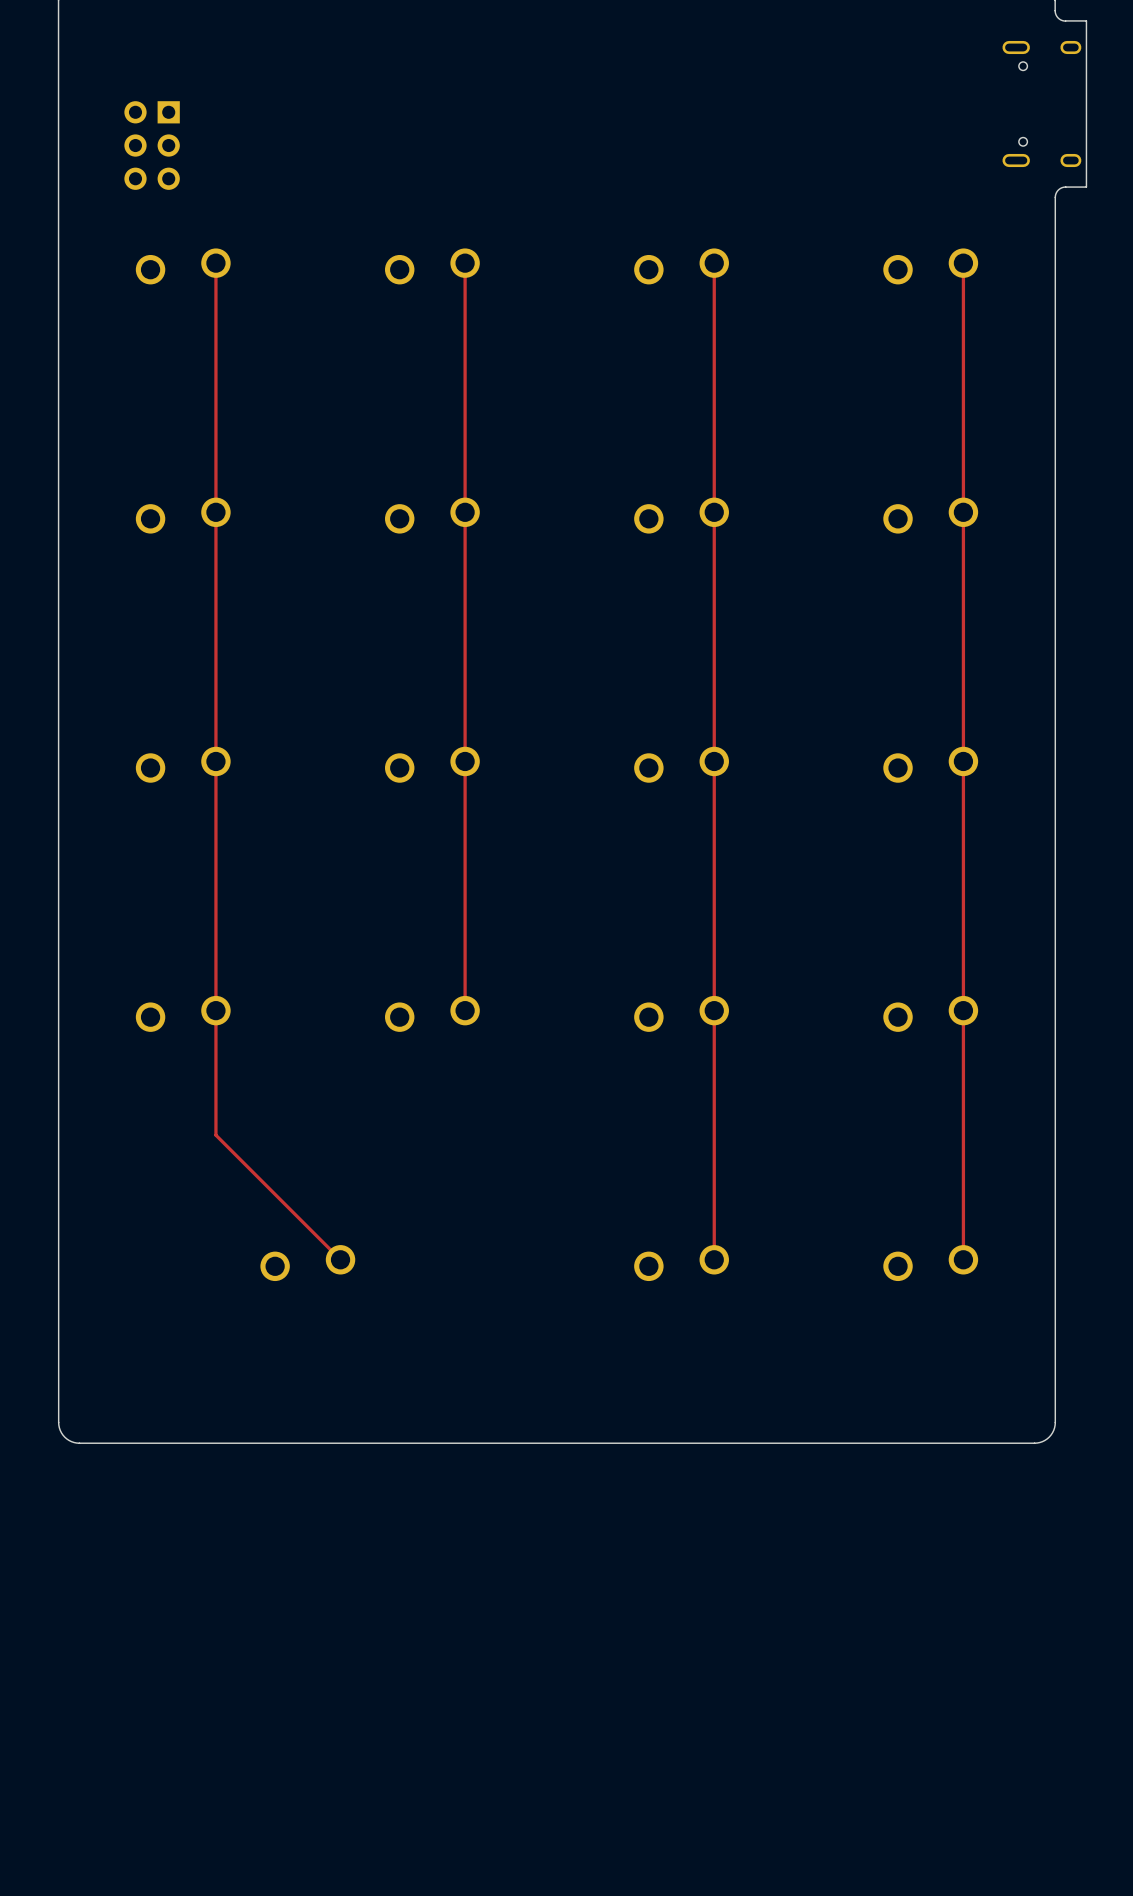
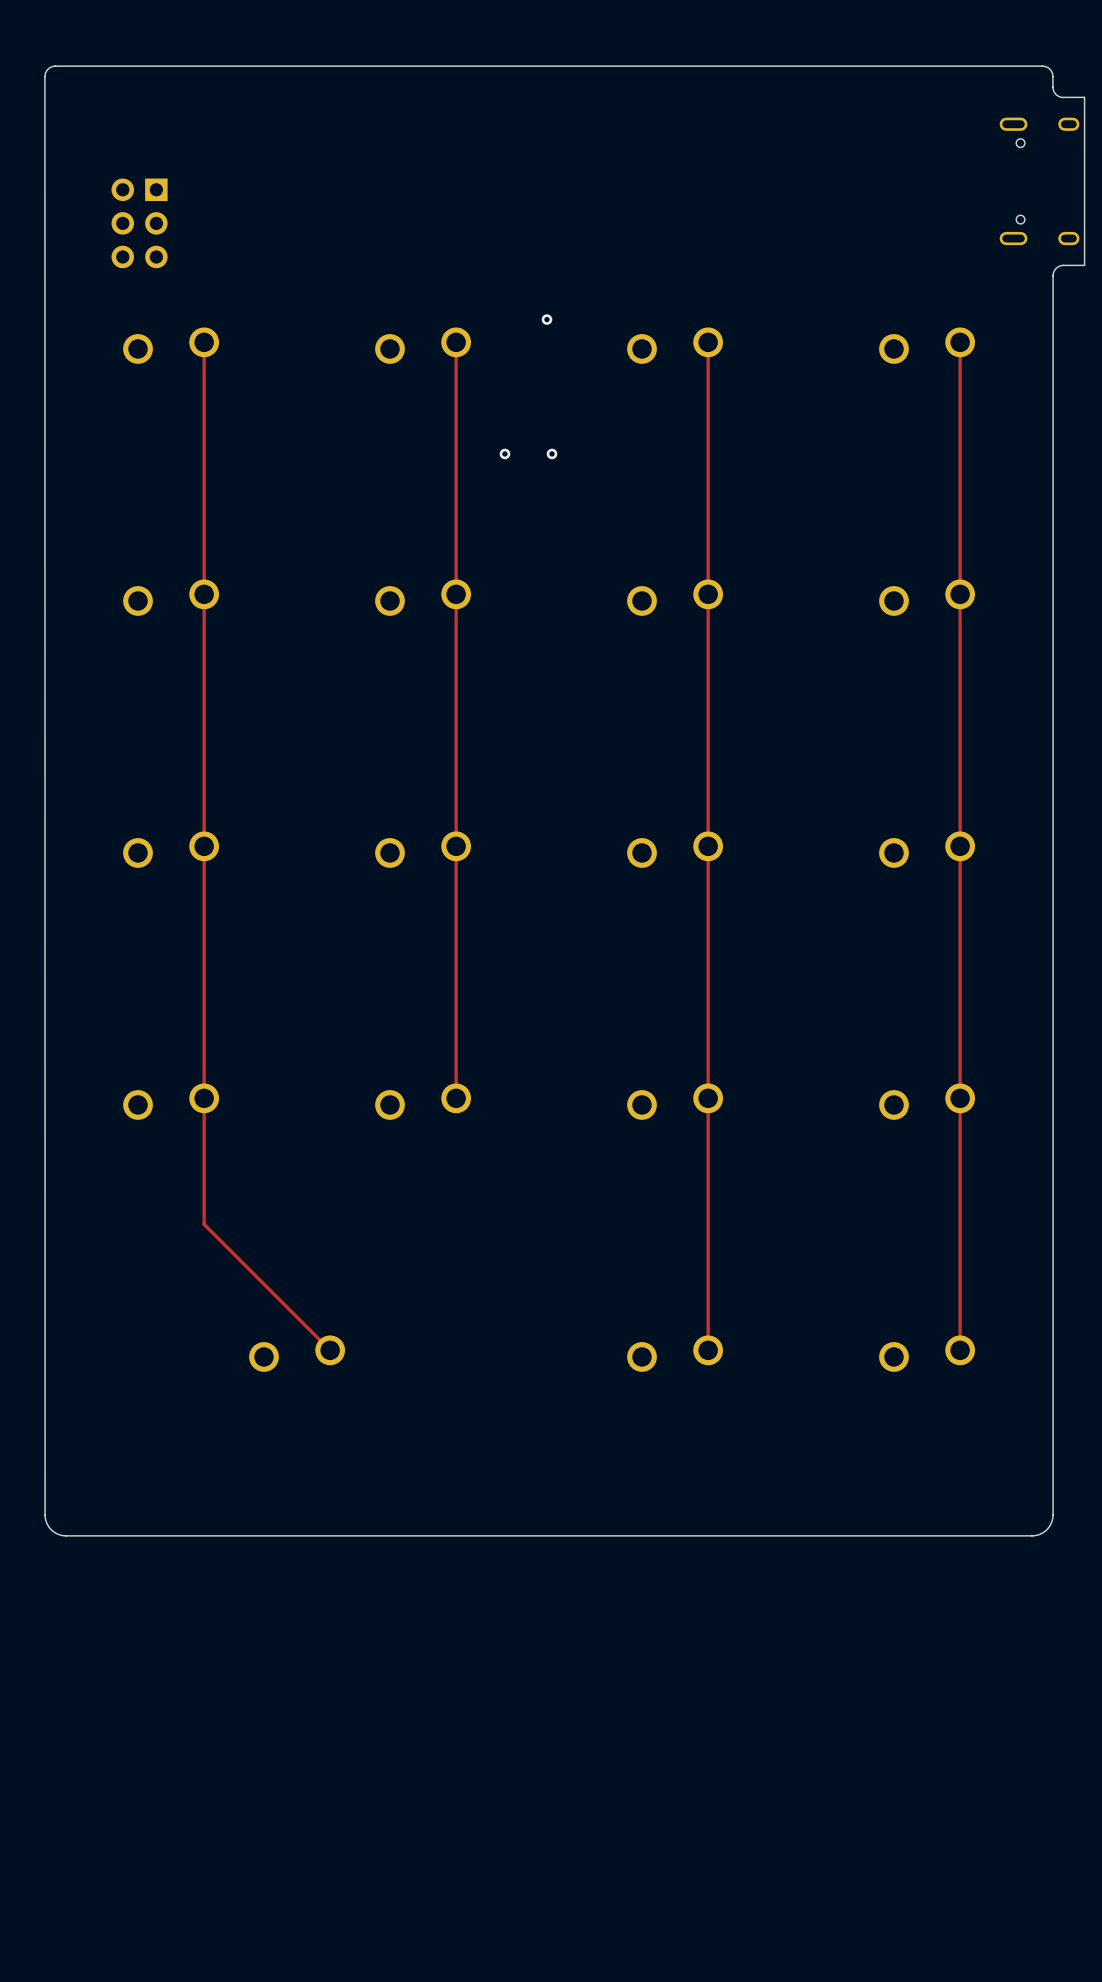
via: none -> (546, 319)
via: none -> (504, 453)
via: none -> (552, 453)

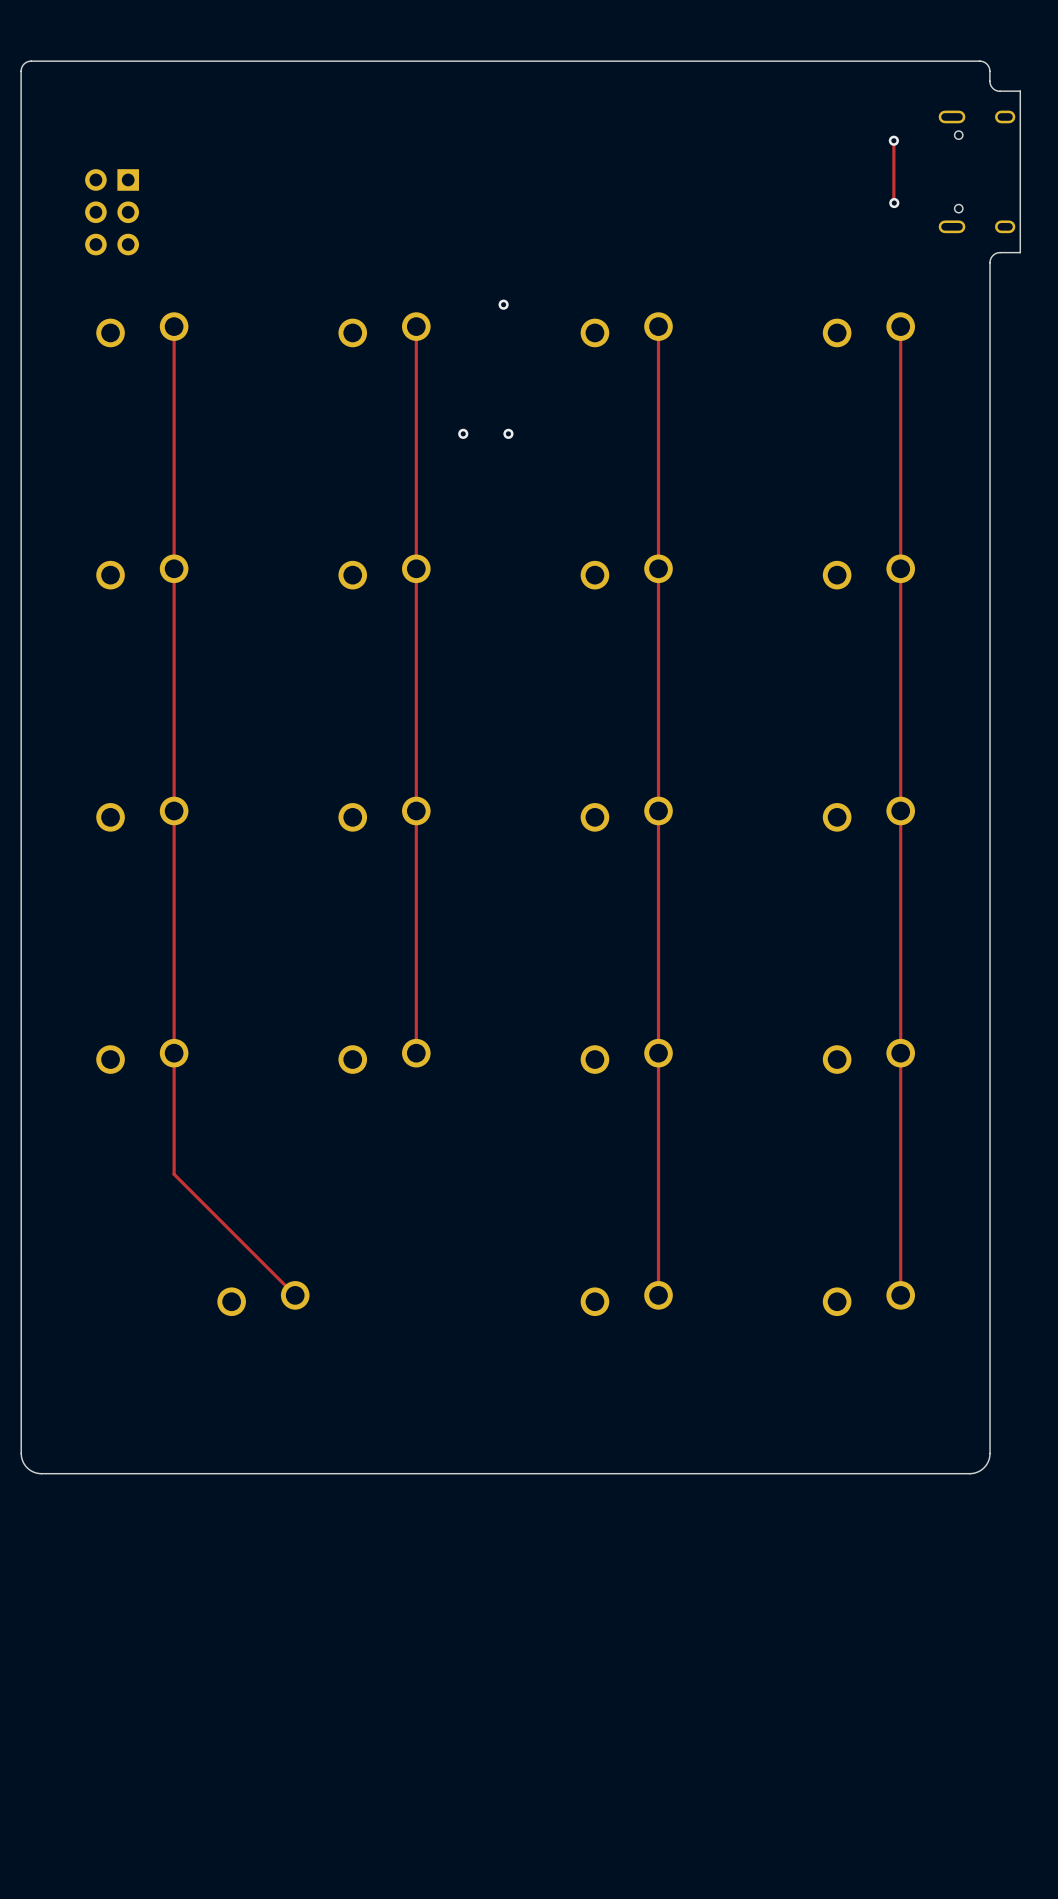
track: none -> (893, 140) (894, 203)
via: none -> (893, 140)
via: none -> (894, 203)

